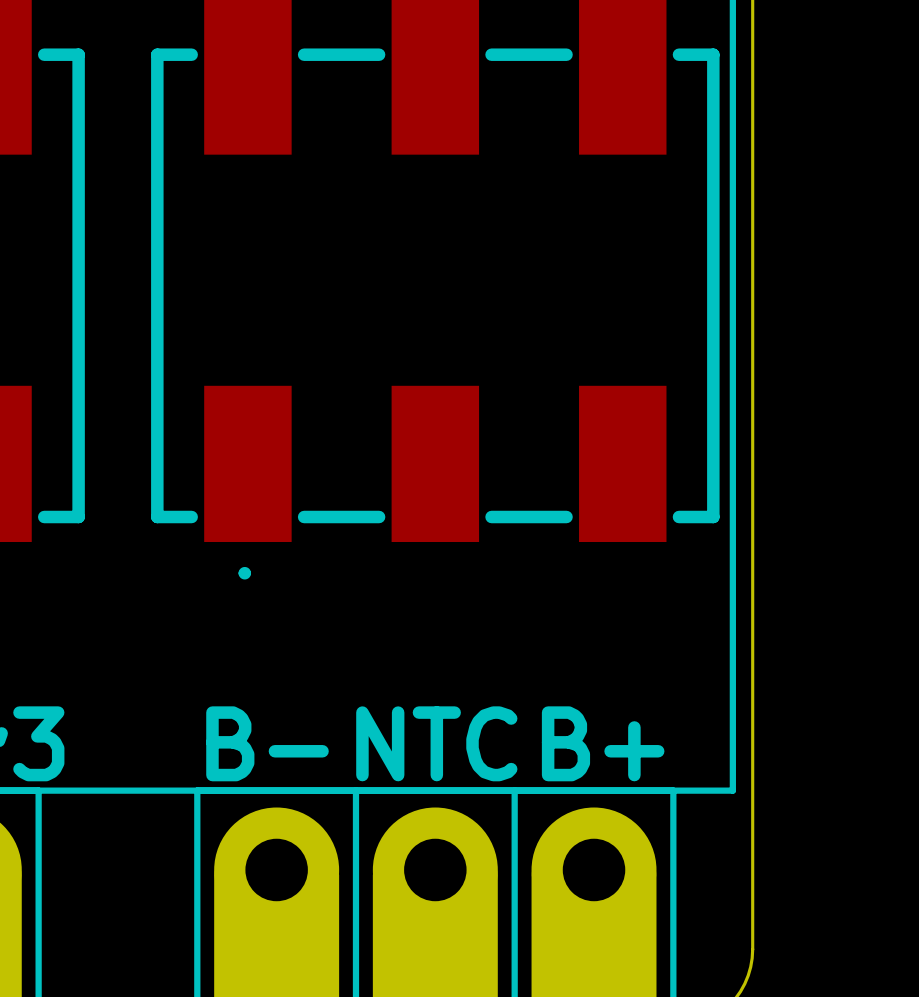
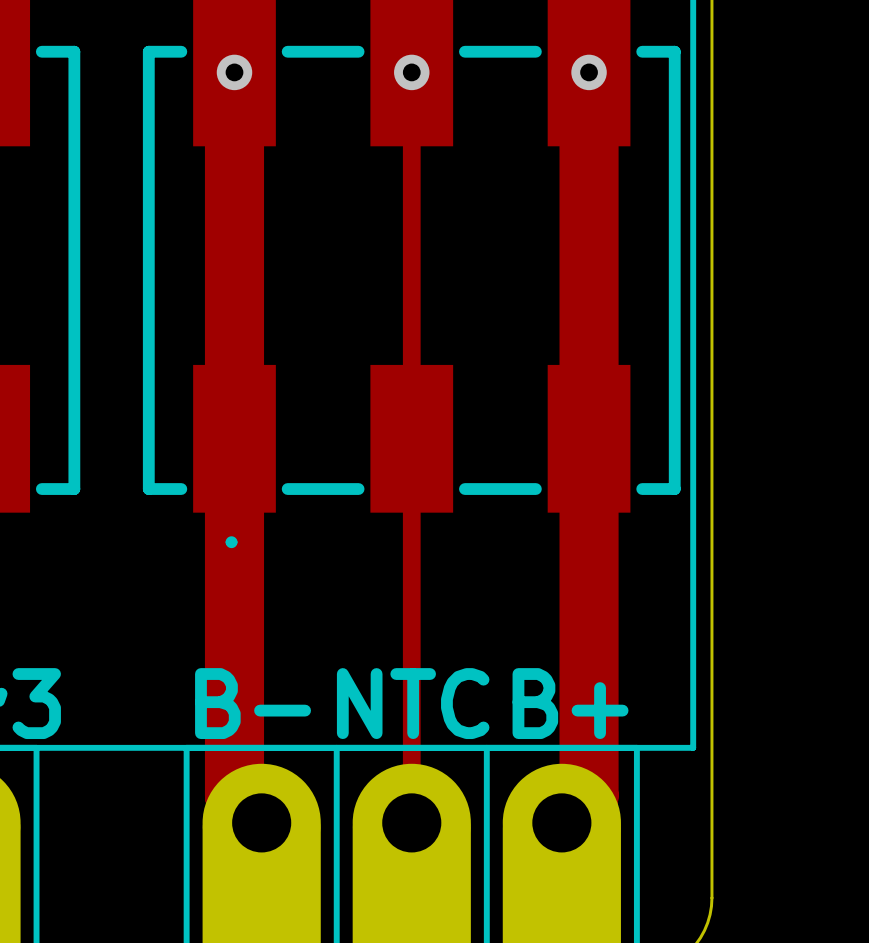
track: none -> (234, 72) (234, 795) (261, 822)
via: none -> (234, 72)
track: none -> (411, 72) (411, 822)
via: none -> (411, 72)
track: none -> (589, 72) (589, 795) (561, 822)
via: none -> (589, 72)

